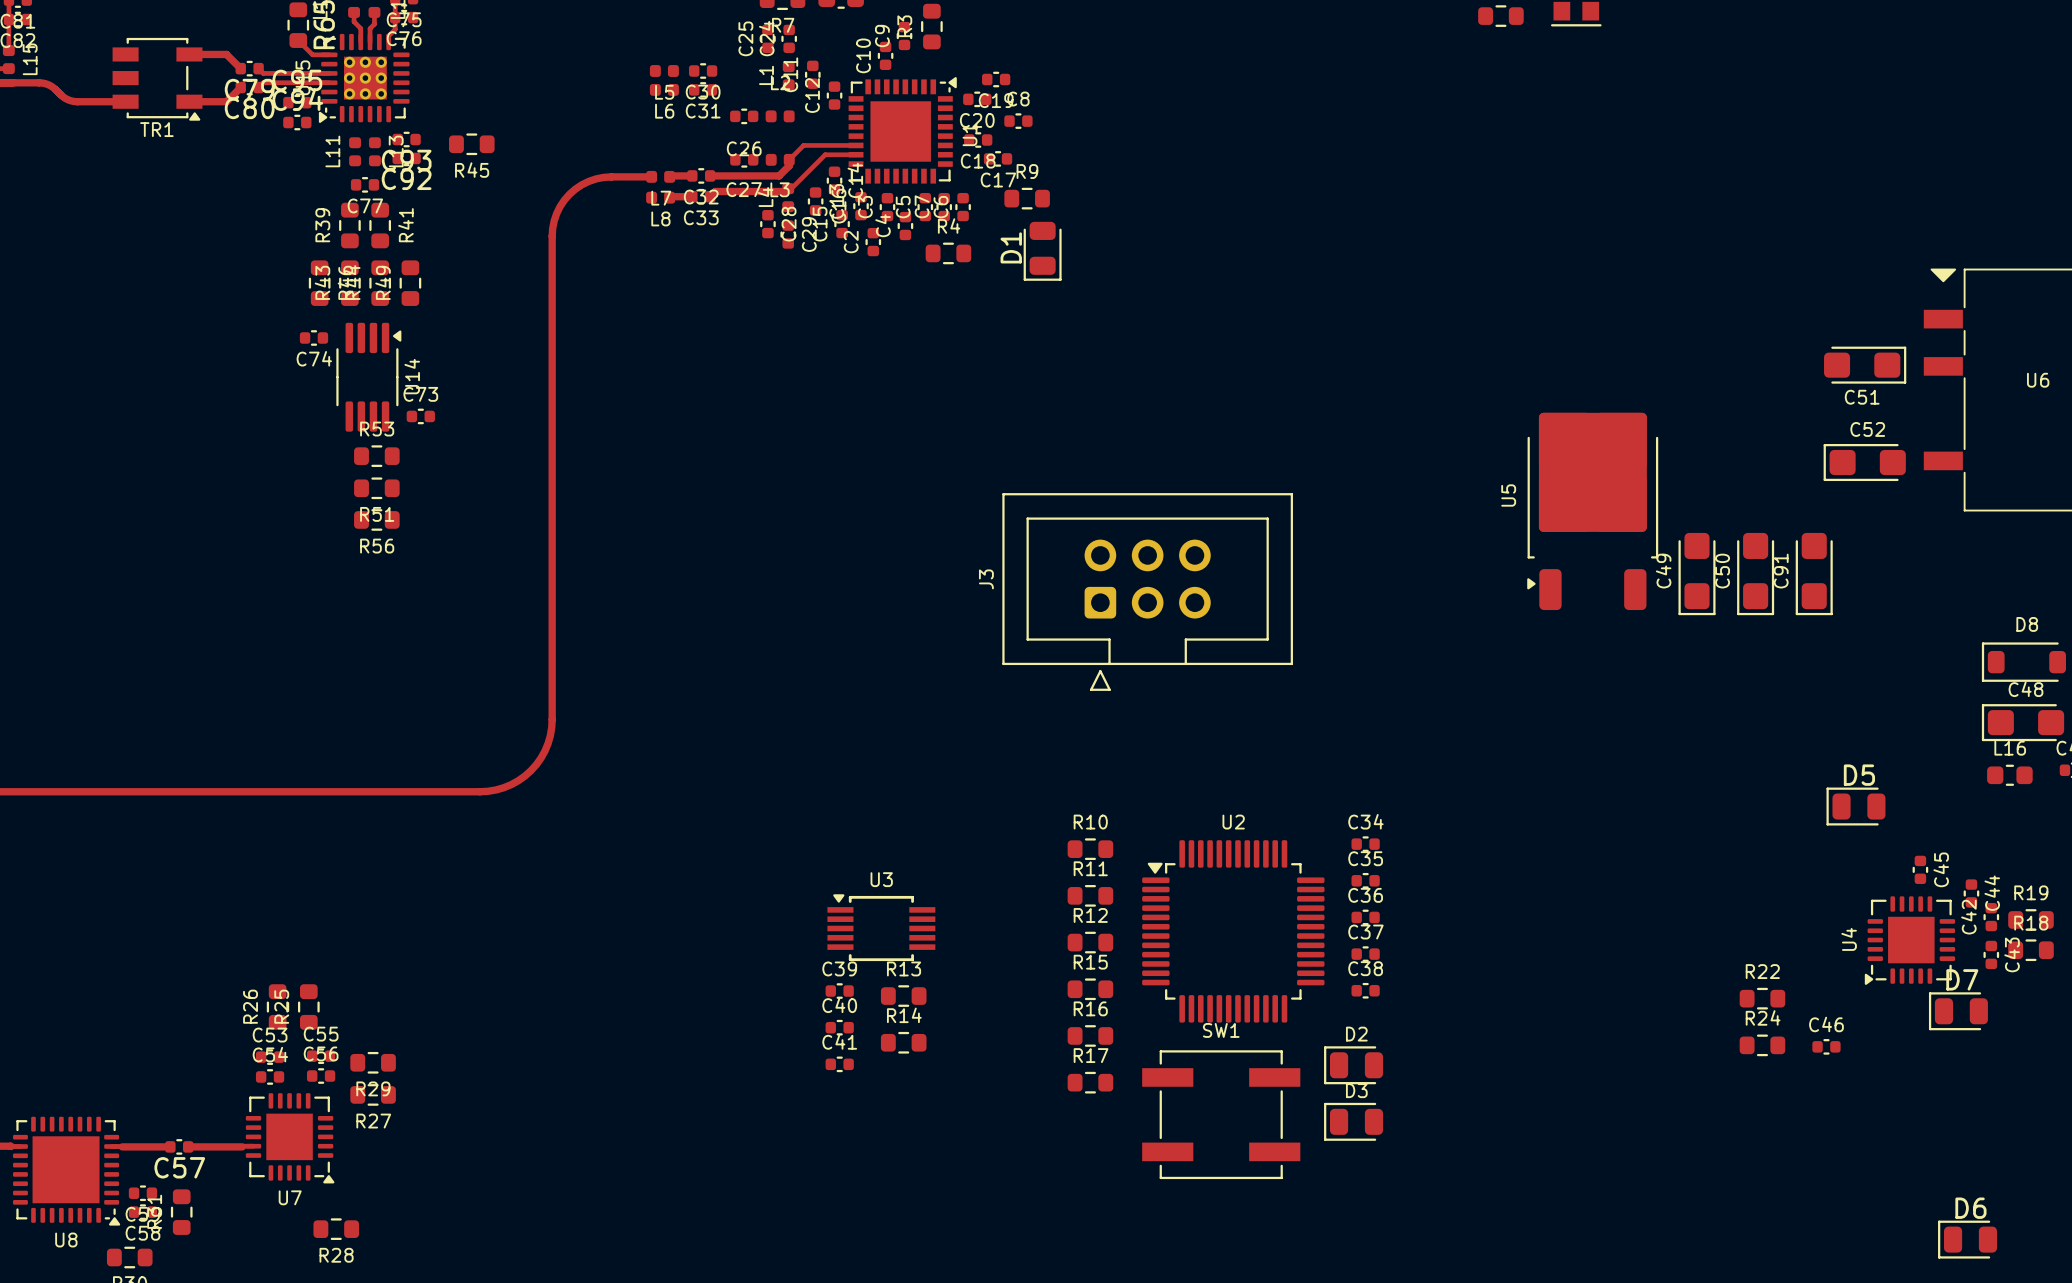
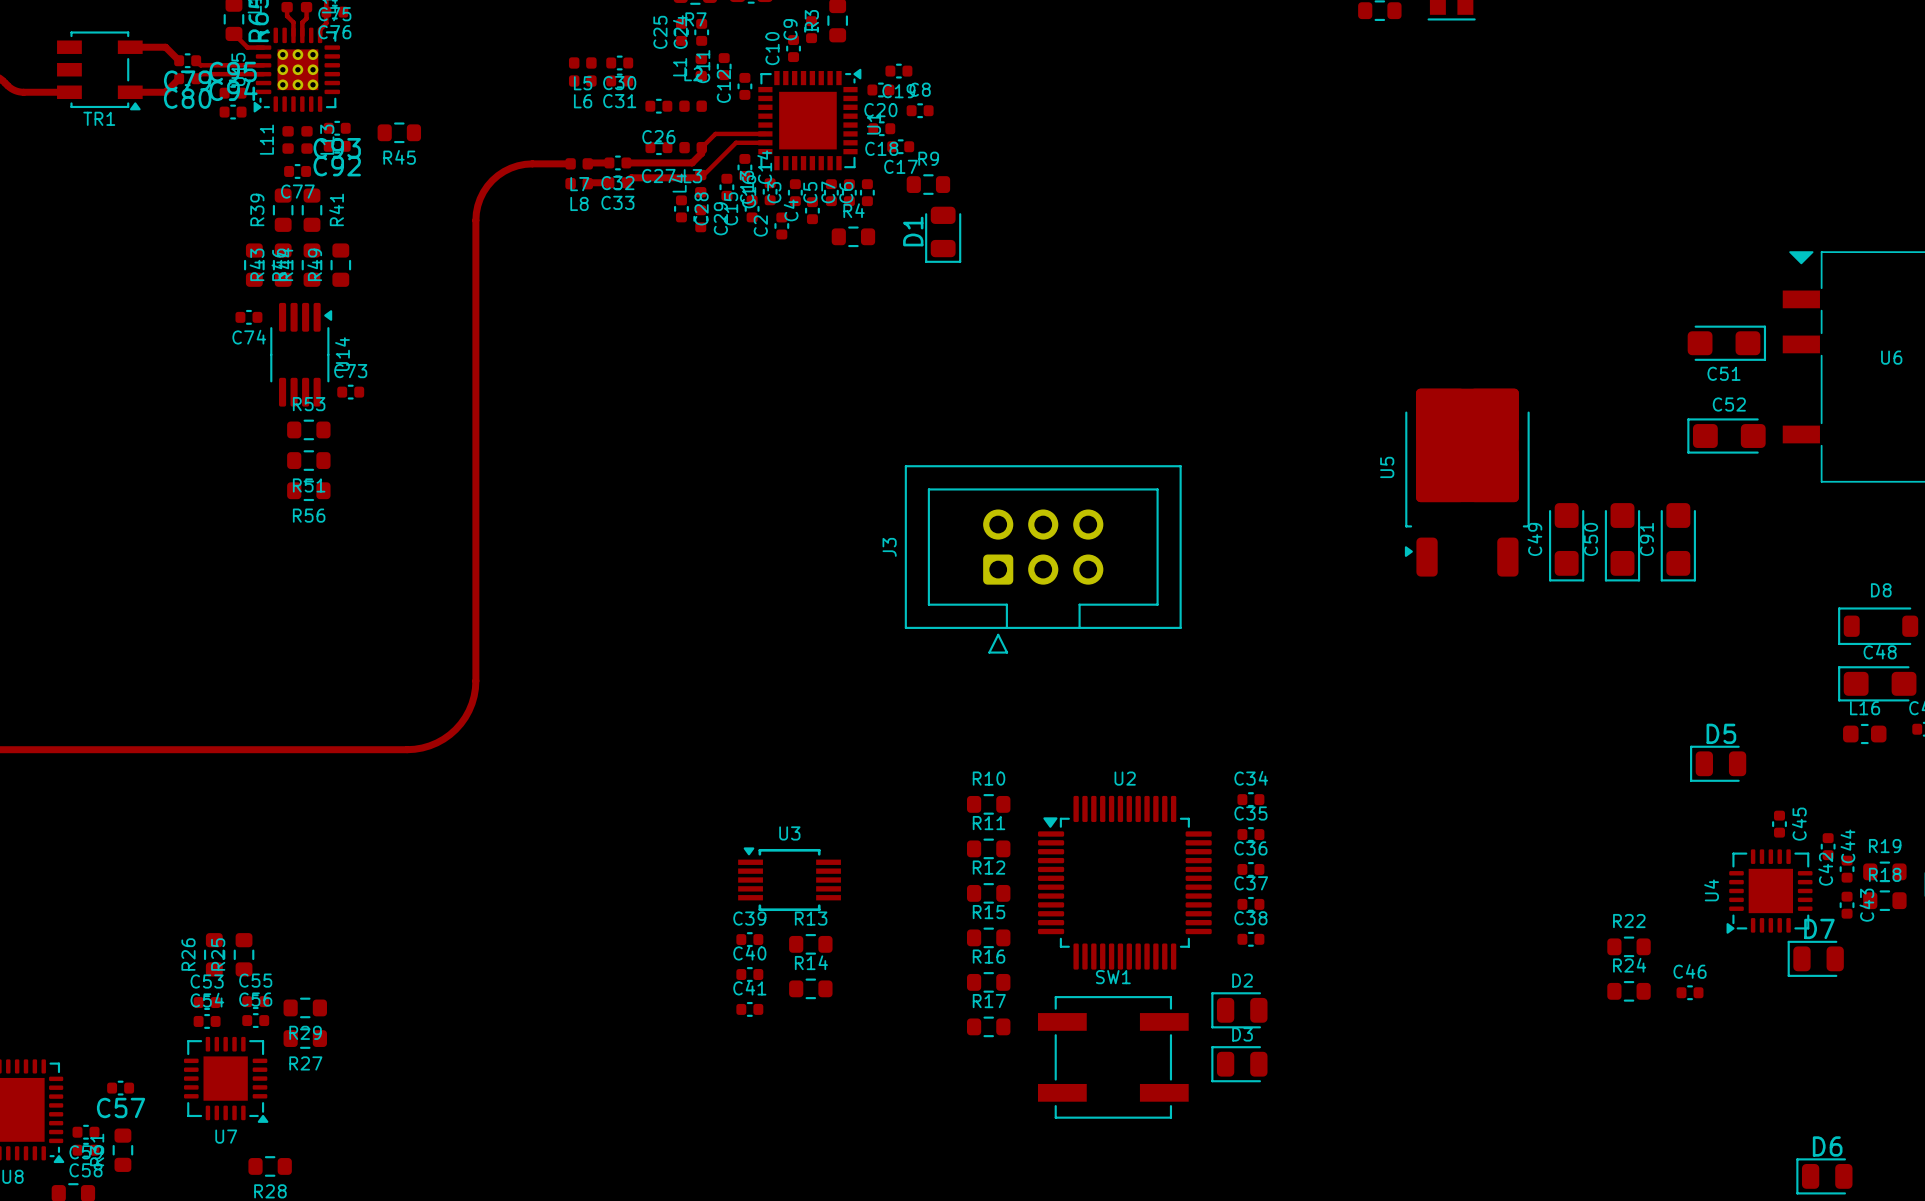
track: (111, 1146) (170, 1146) -> none
track: (253, 1146) (188, 1146) -> none

